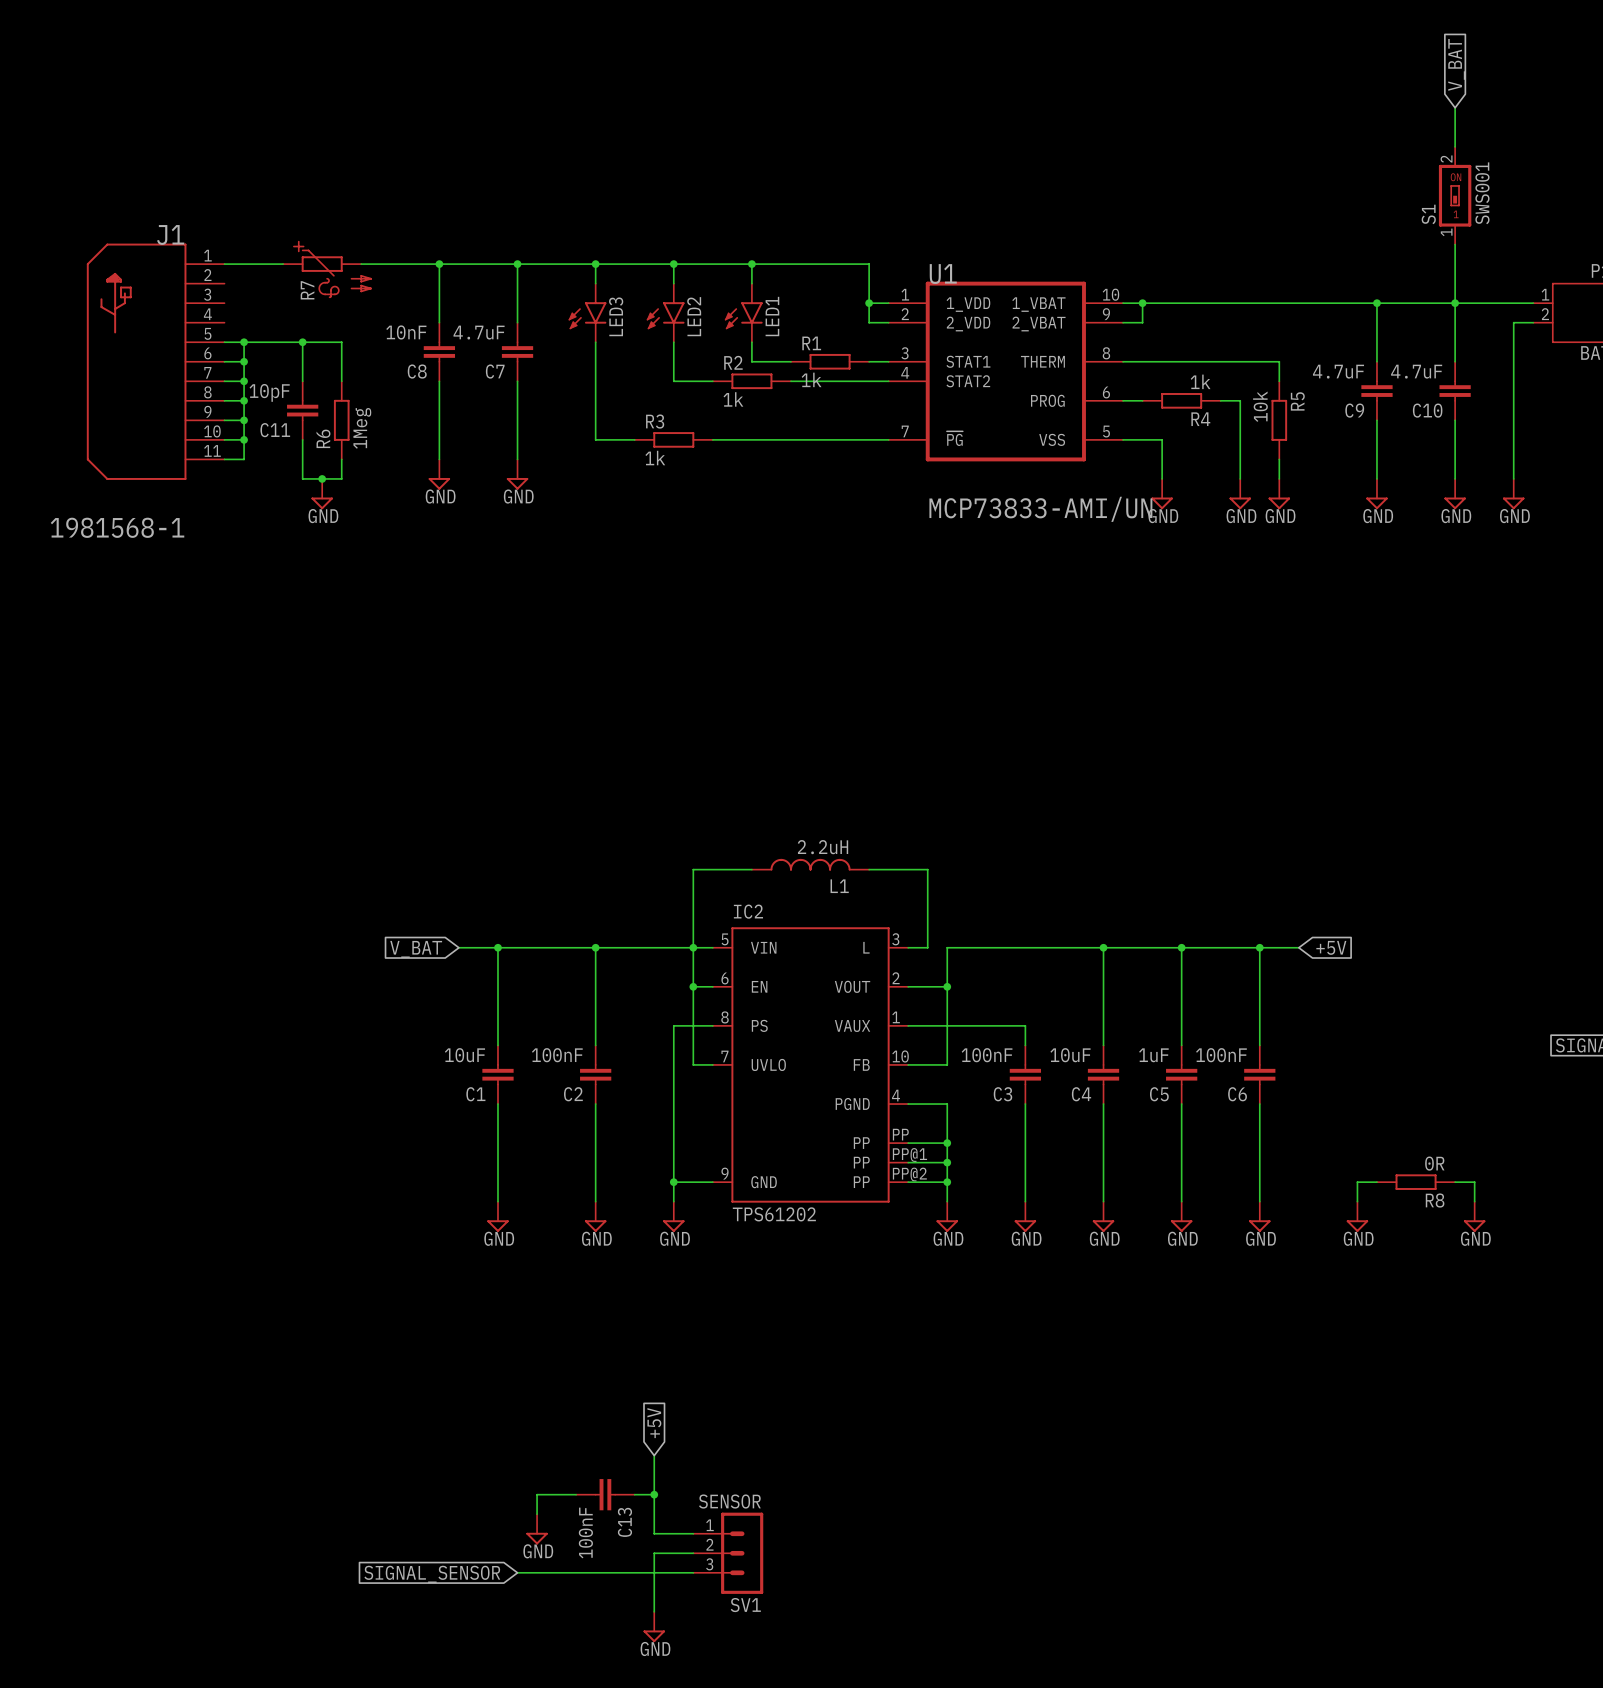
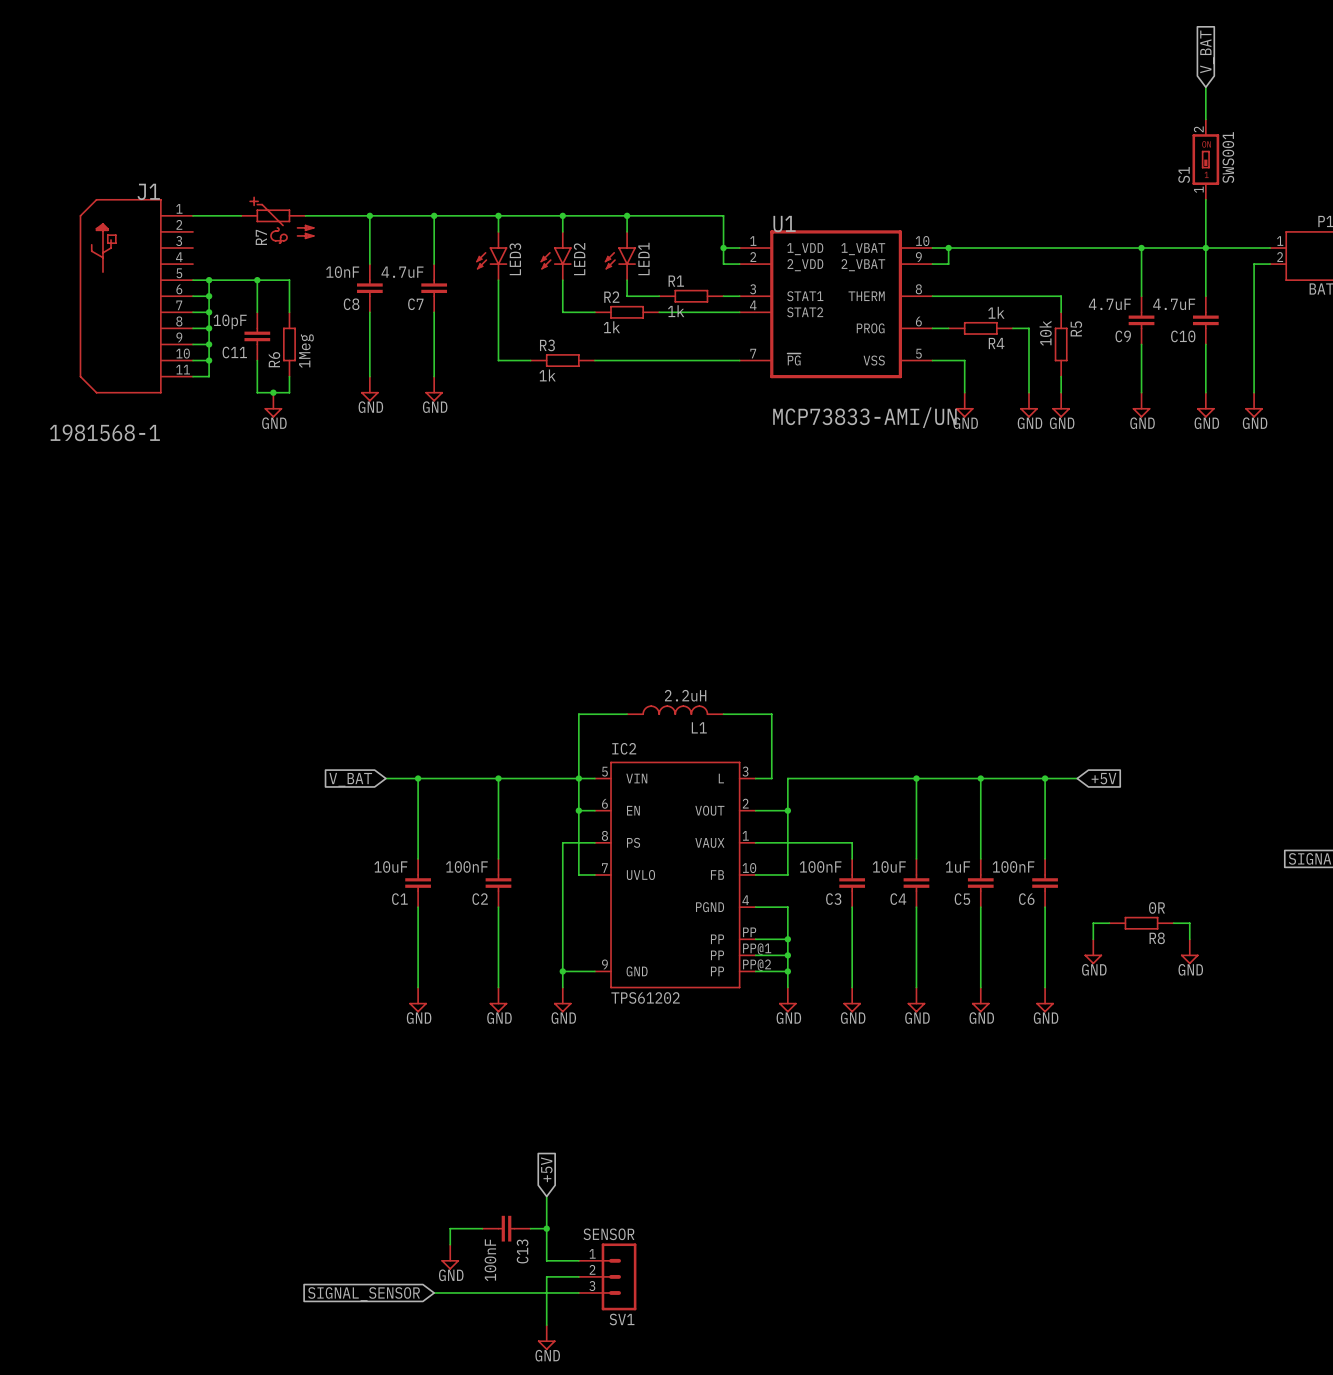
power symbol: none -> GND (1093, 951)
power symbol: none -> GND (1189, 951)
wire: (1376, 1182) (1357, 1182) (1357, 1201) -> (1109, 923) (1093, 923) (1093, 939)
R8 position: (1416, 1182) -> (1141, 923)
wire: (1455, 1182) (1474, 1182) (1474, 1201) -> (1173, 923) (1189, 923) (1189, 939)
power symbol: GND (1357, 1216) -> none
power symbol: GND (1474, 1216) -> none

